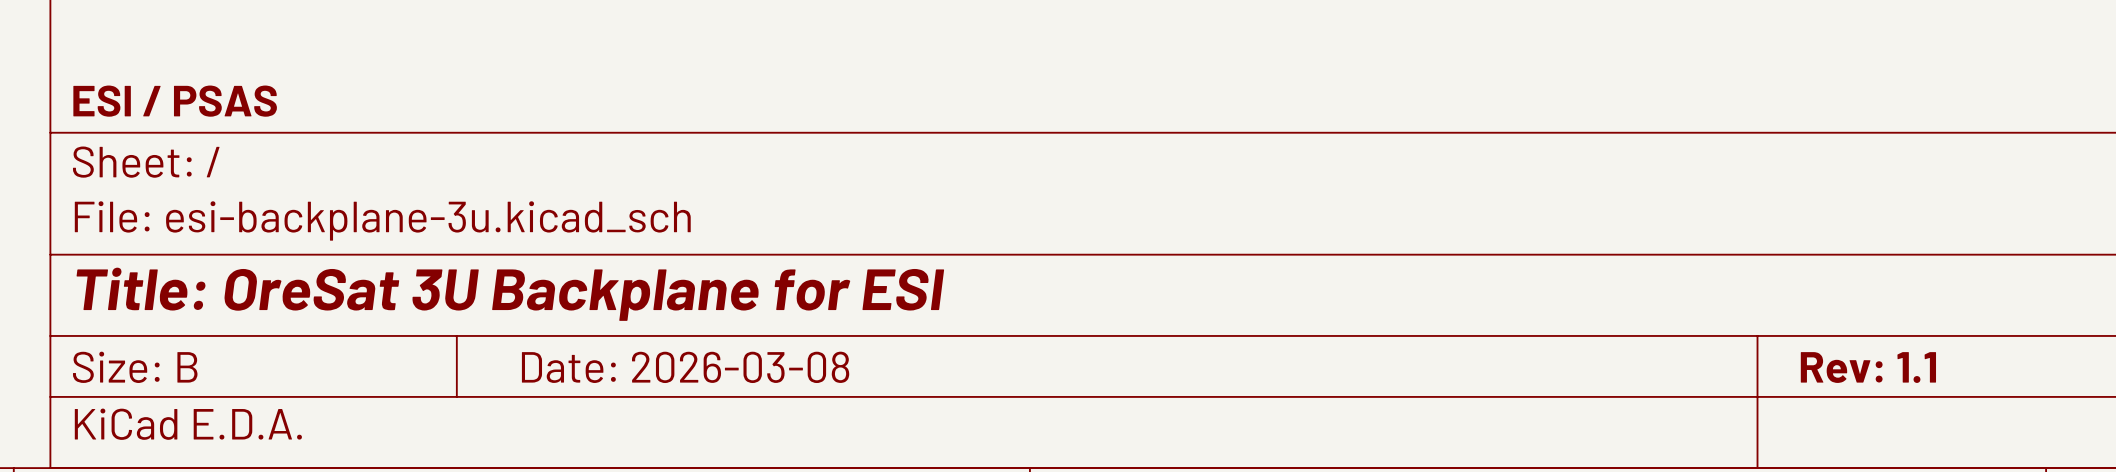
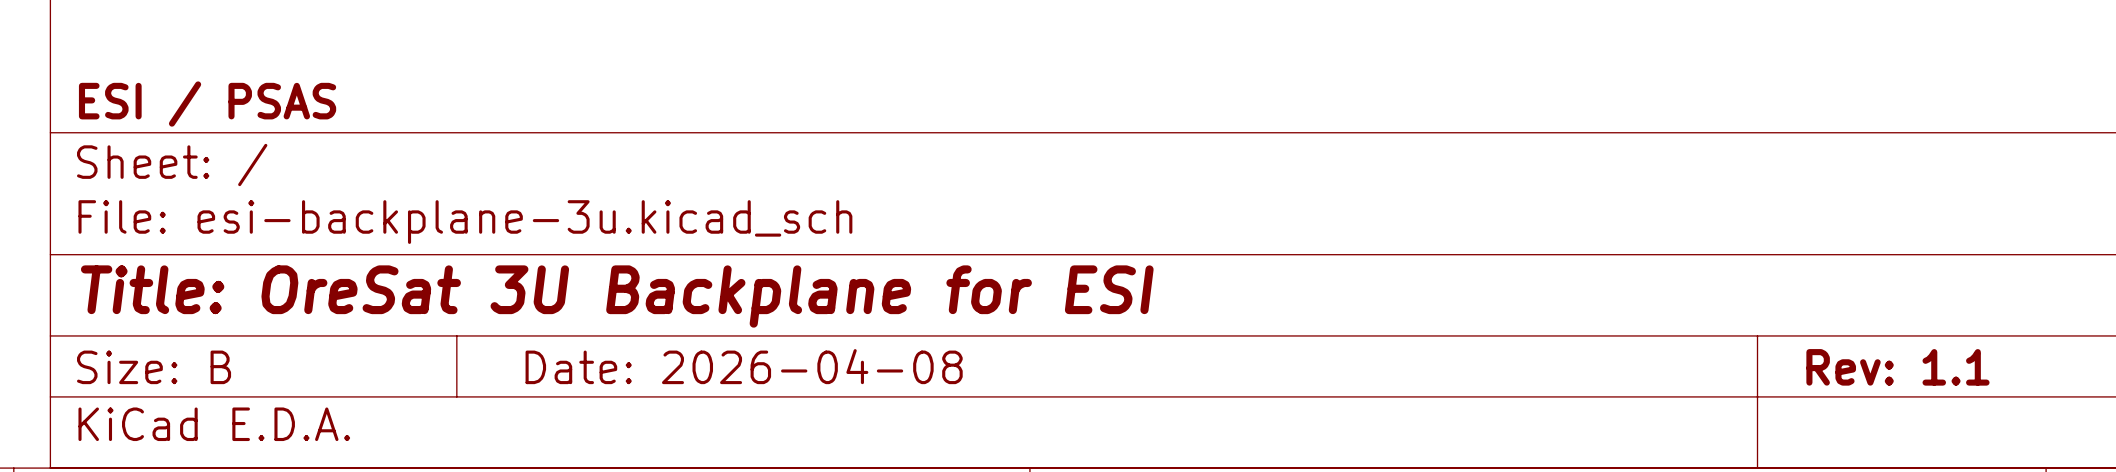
title block: Date: 2026-03-08 (685, 367) -> Date: 2026-04-08 (744, 366)

